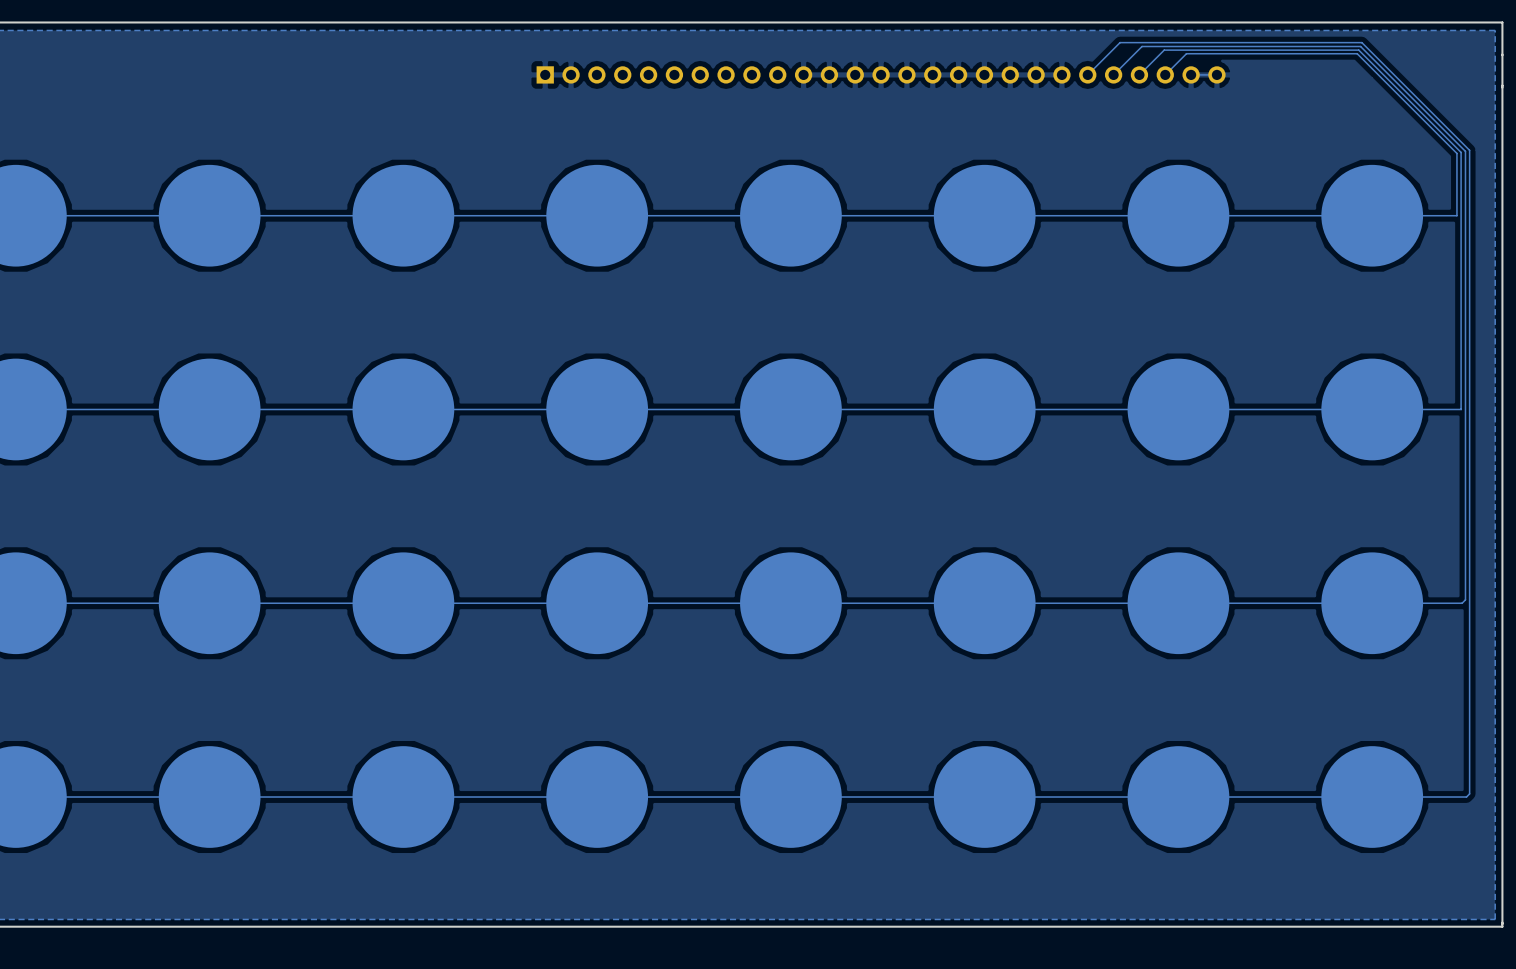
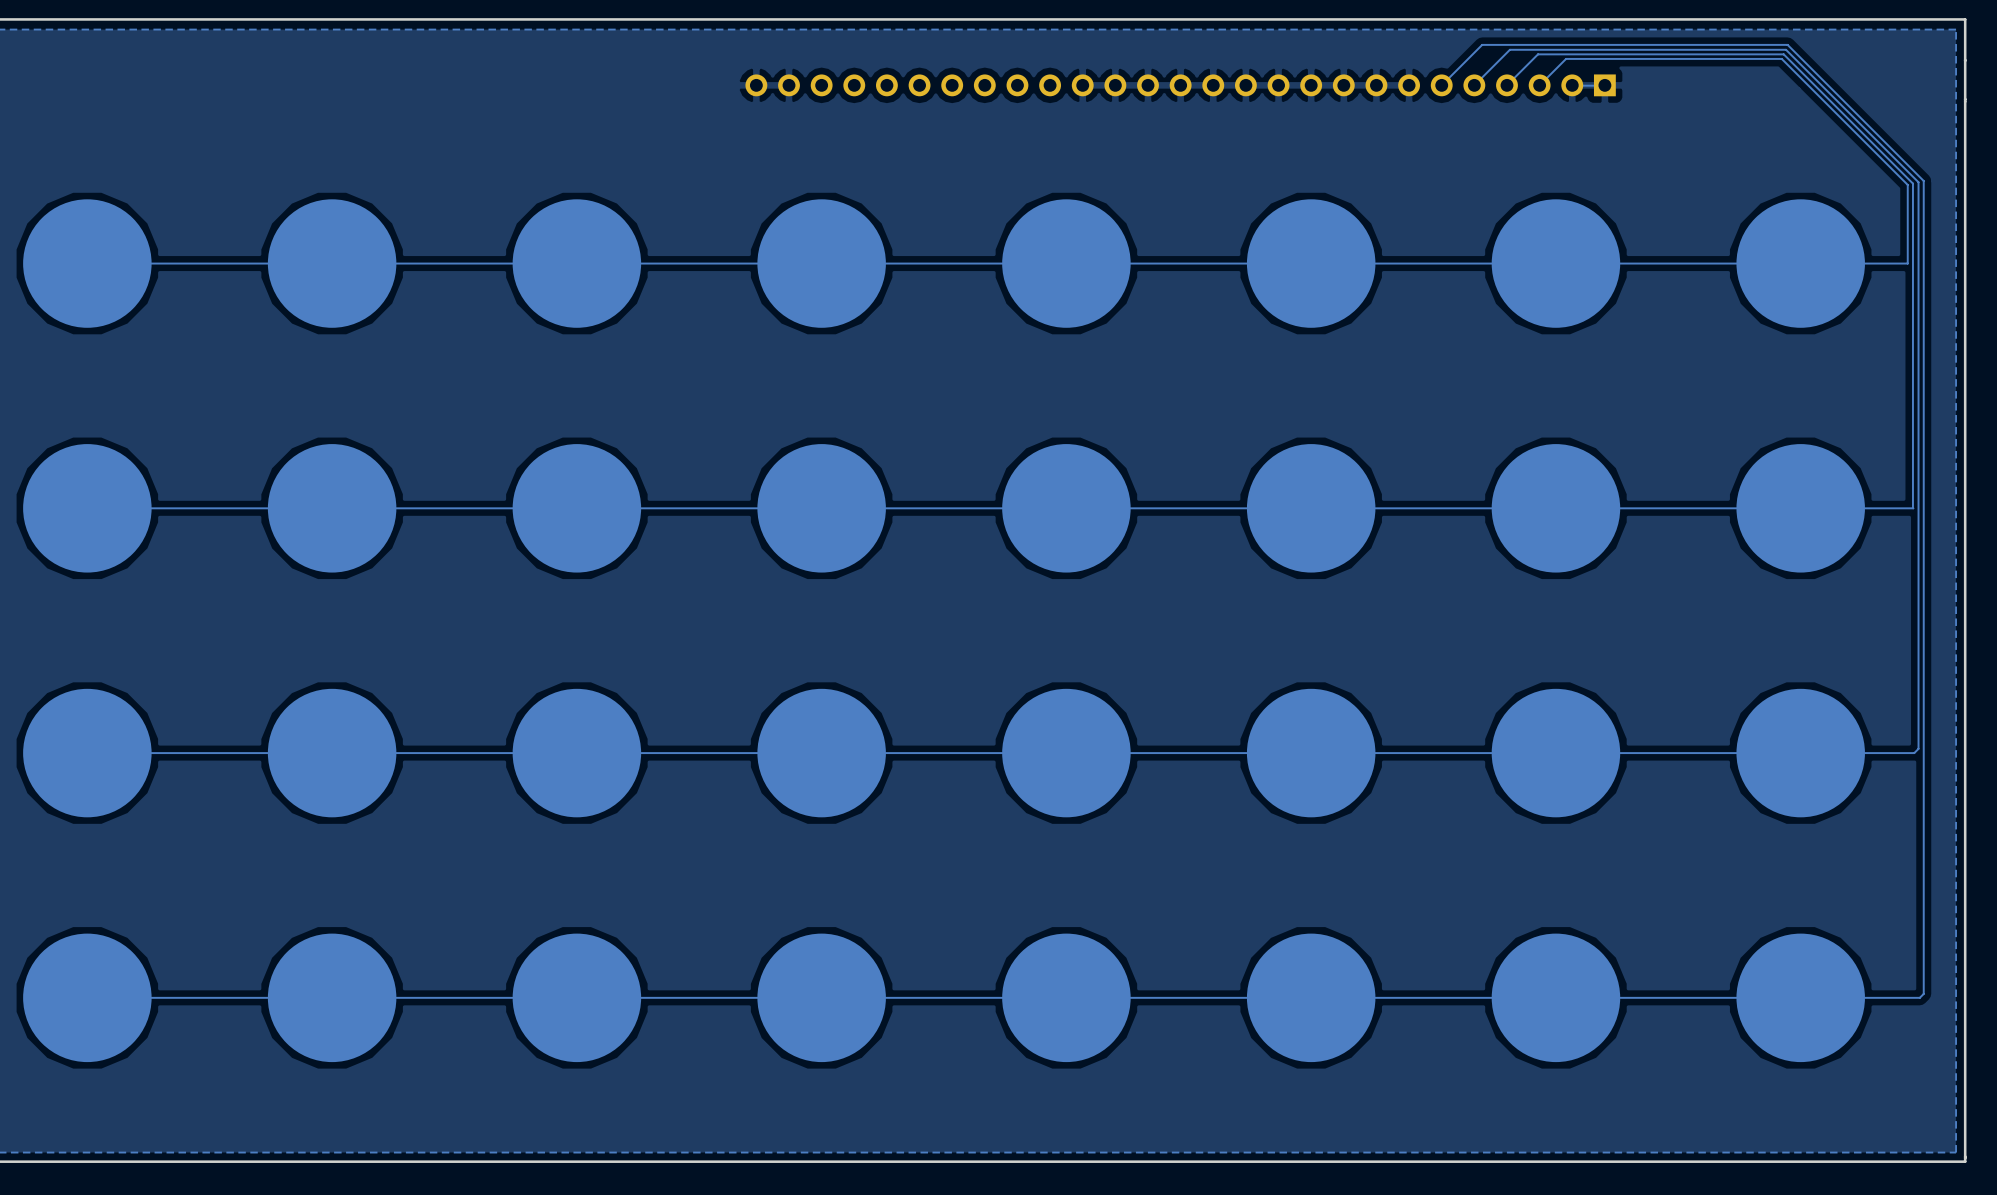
part rotation: 0° (881, 74) -> 180° (1180, 85)

